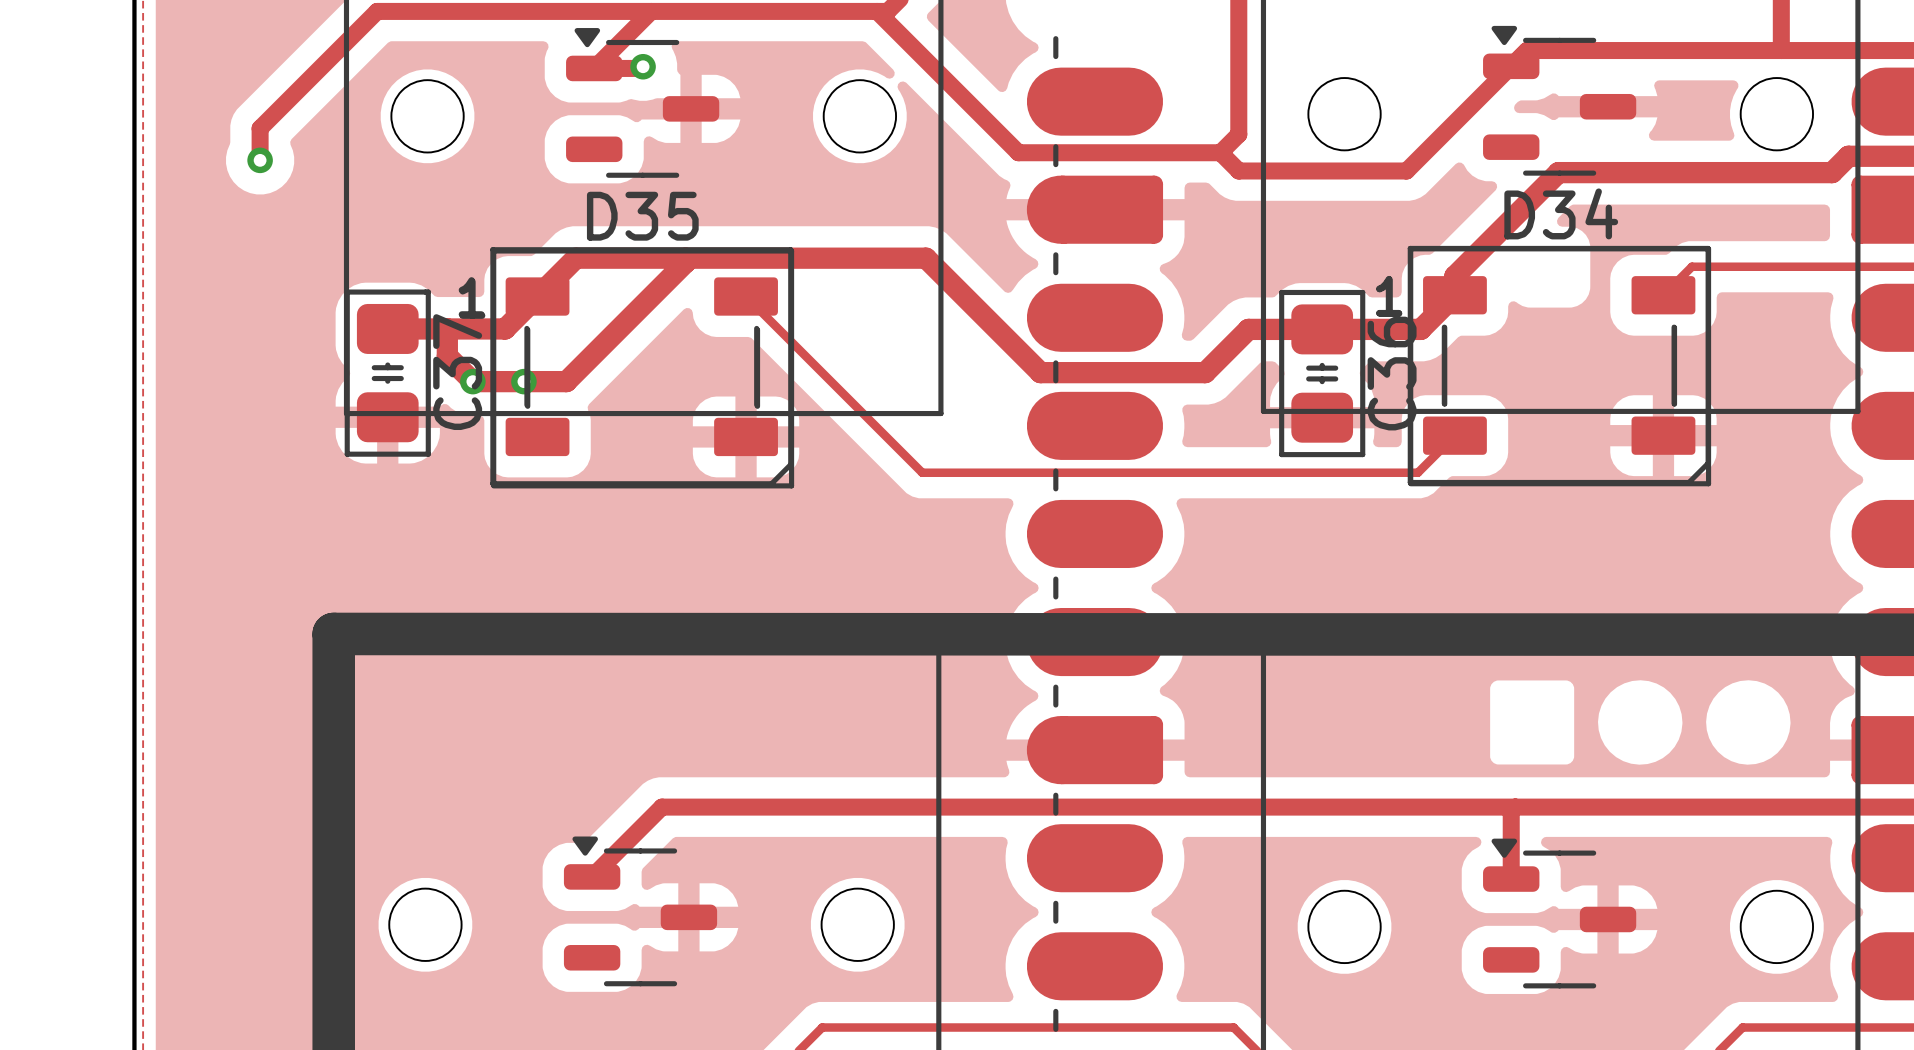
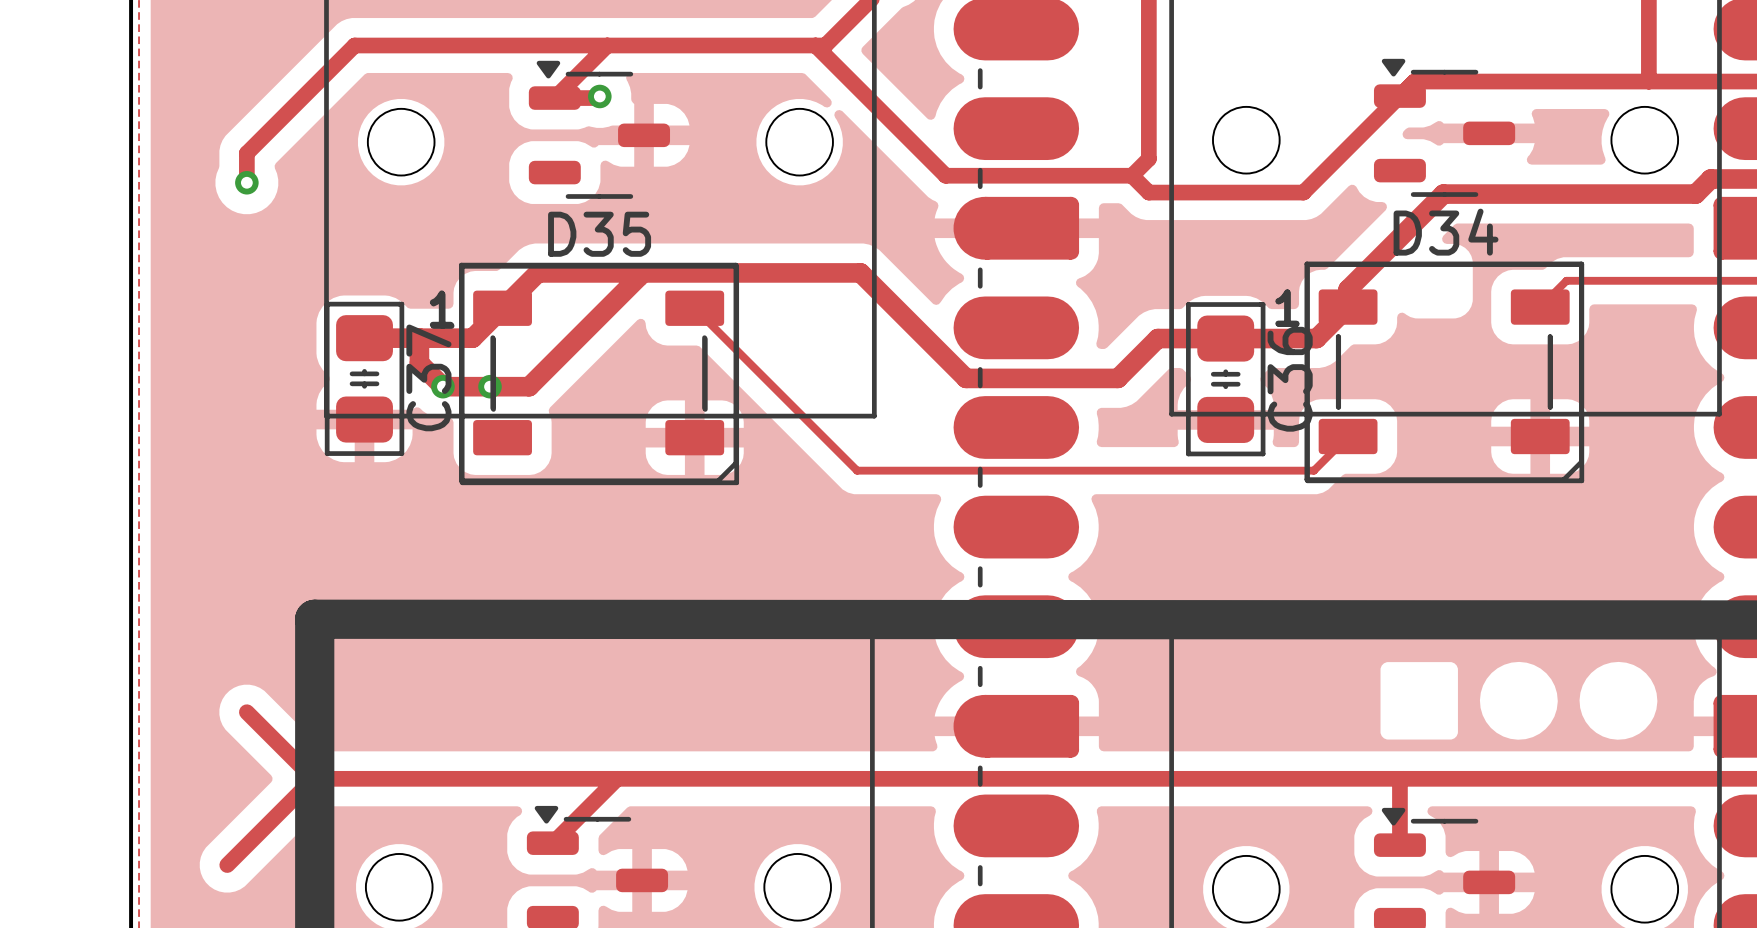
track: none -> (246, 712) (313, 778)
track: none -> (313, 778) (617, 778)
track: none -> (313, 778) (227, 865)

